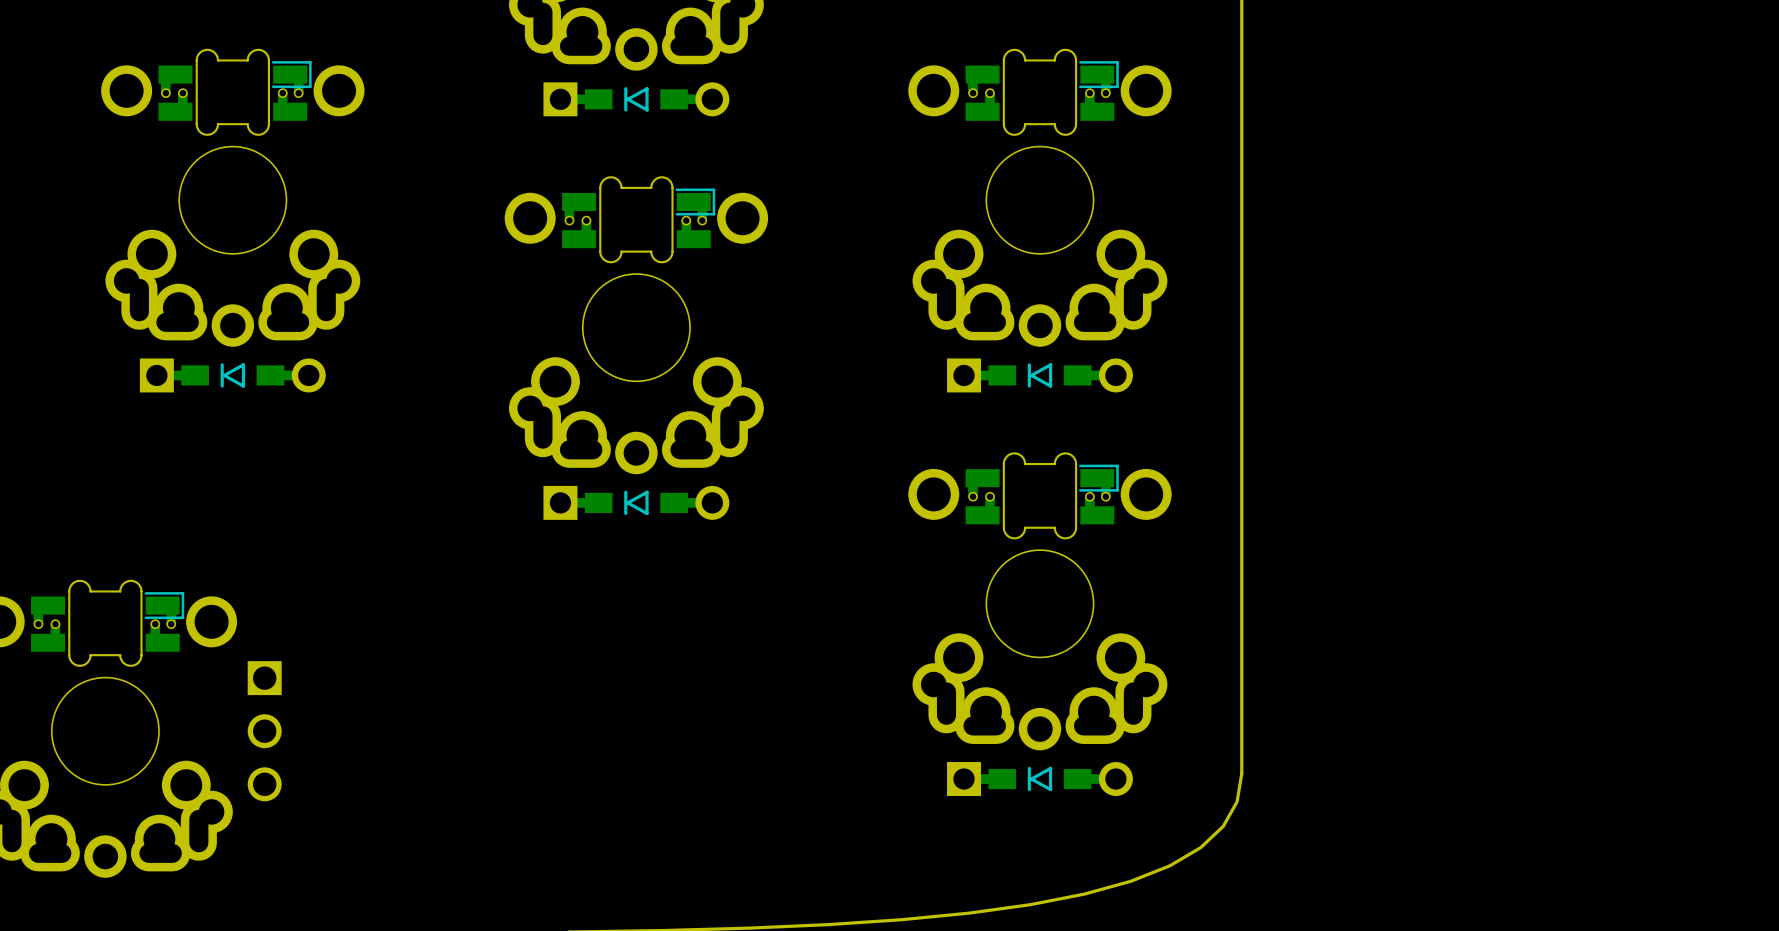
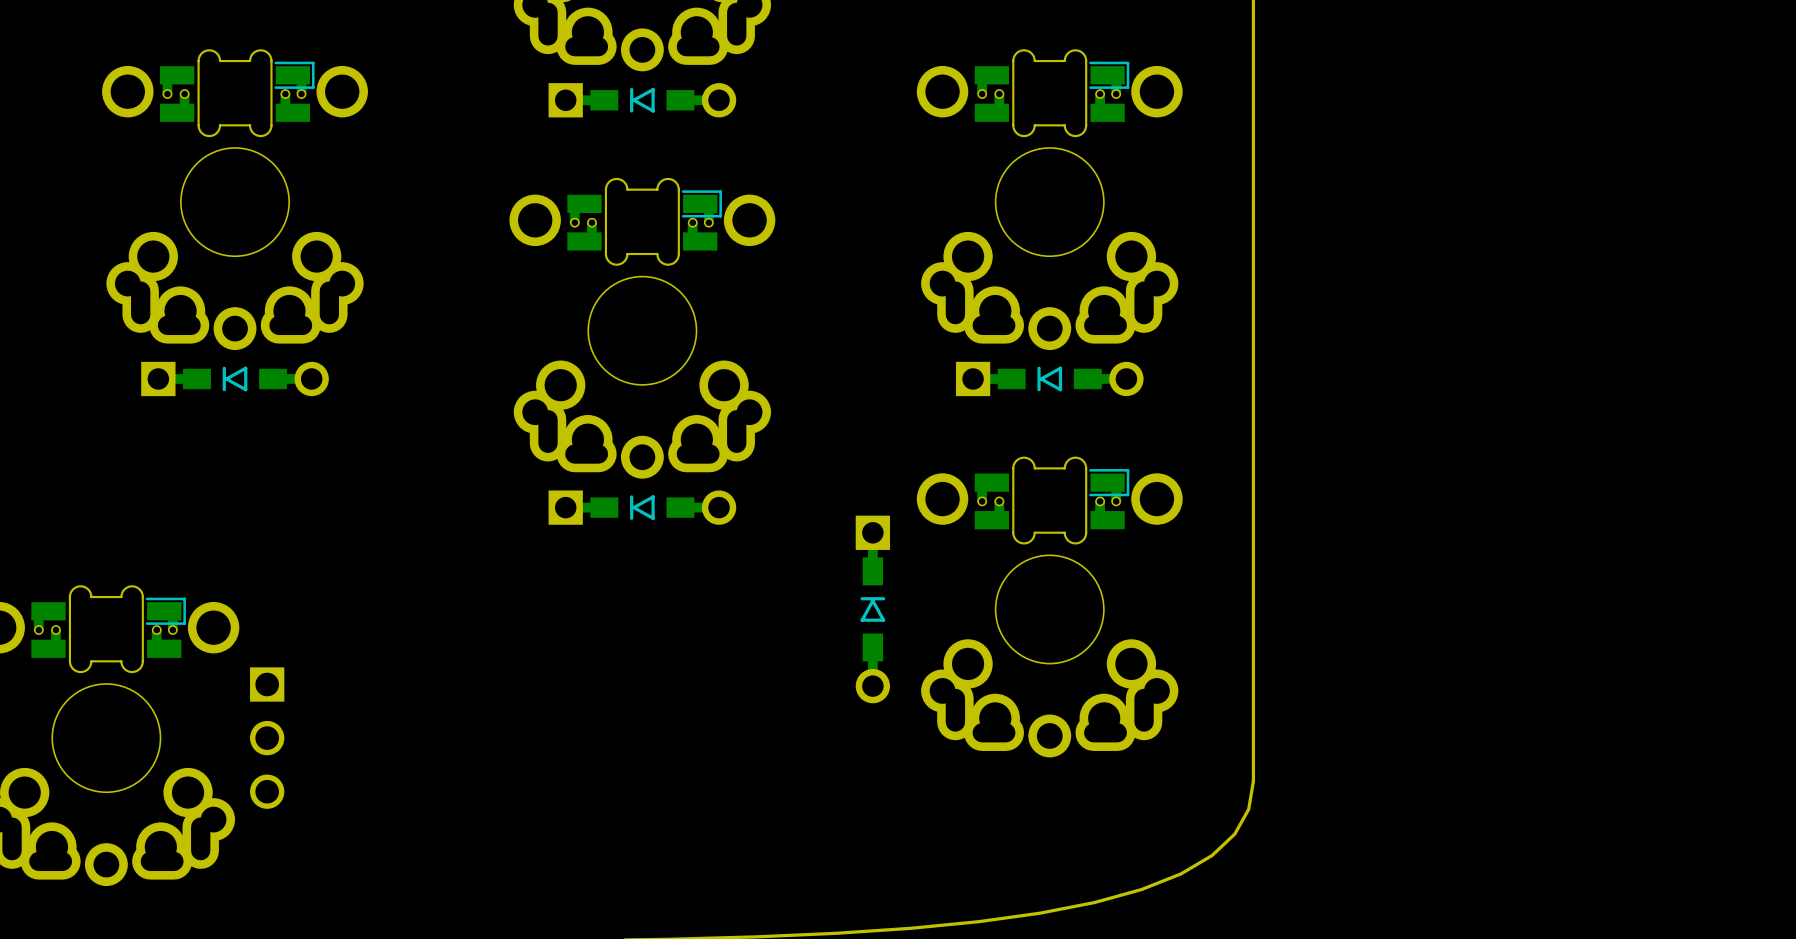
part rotation: 0° (1039, 779) -> 90° clockwise (872, 609)
part position: (1039, 779) -> (872, 609)

